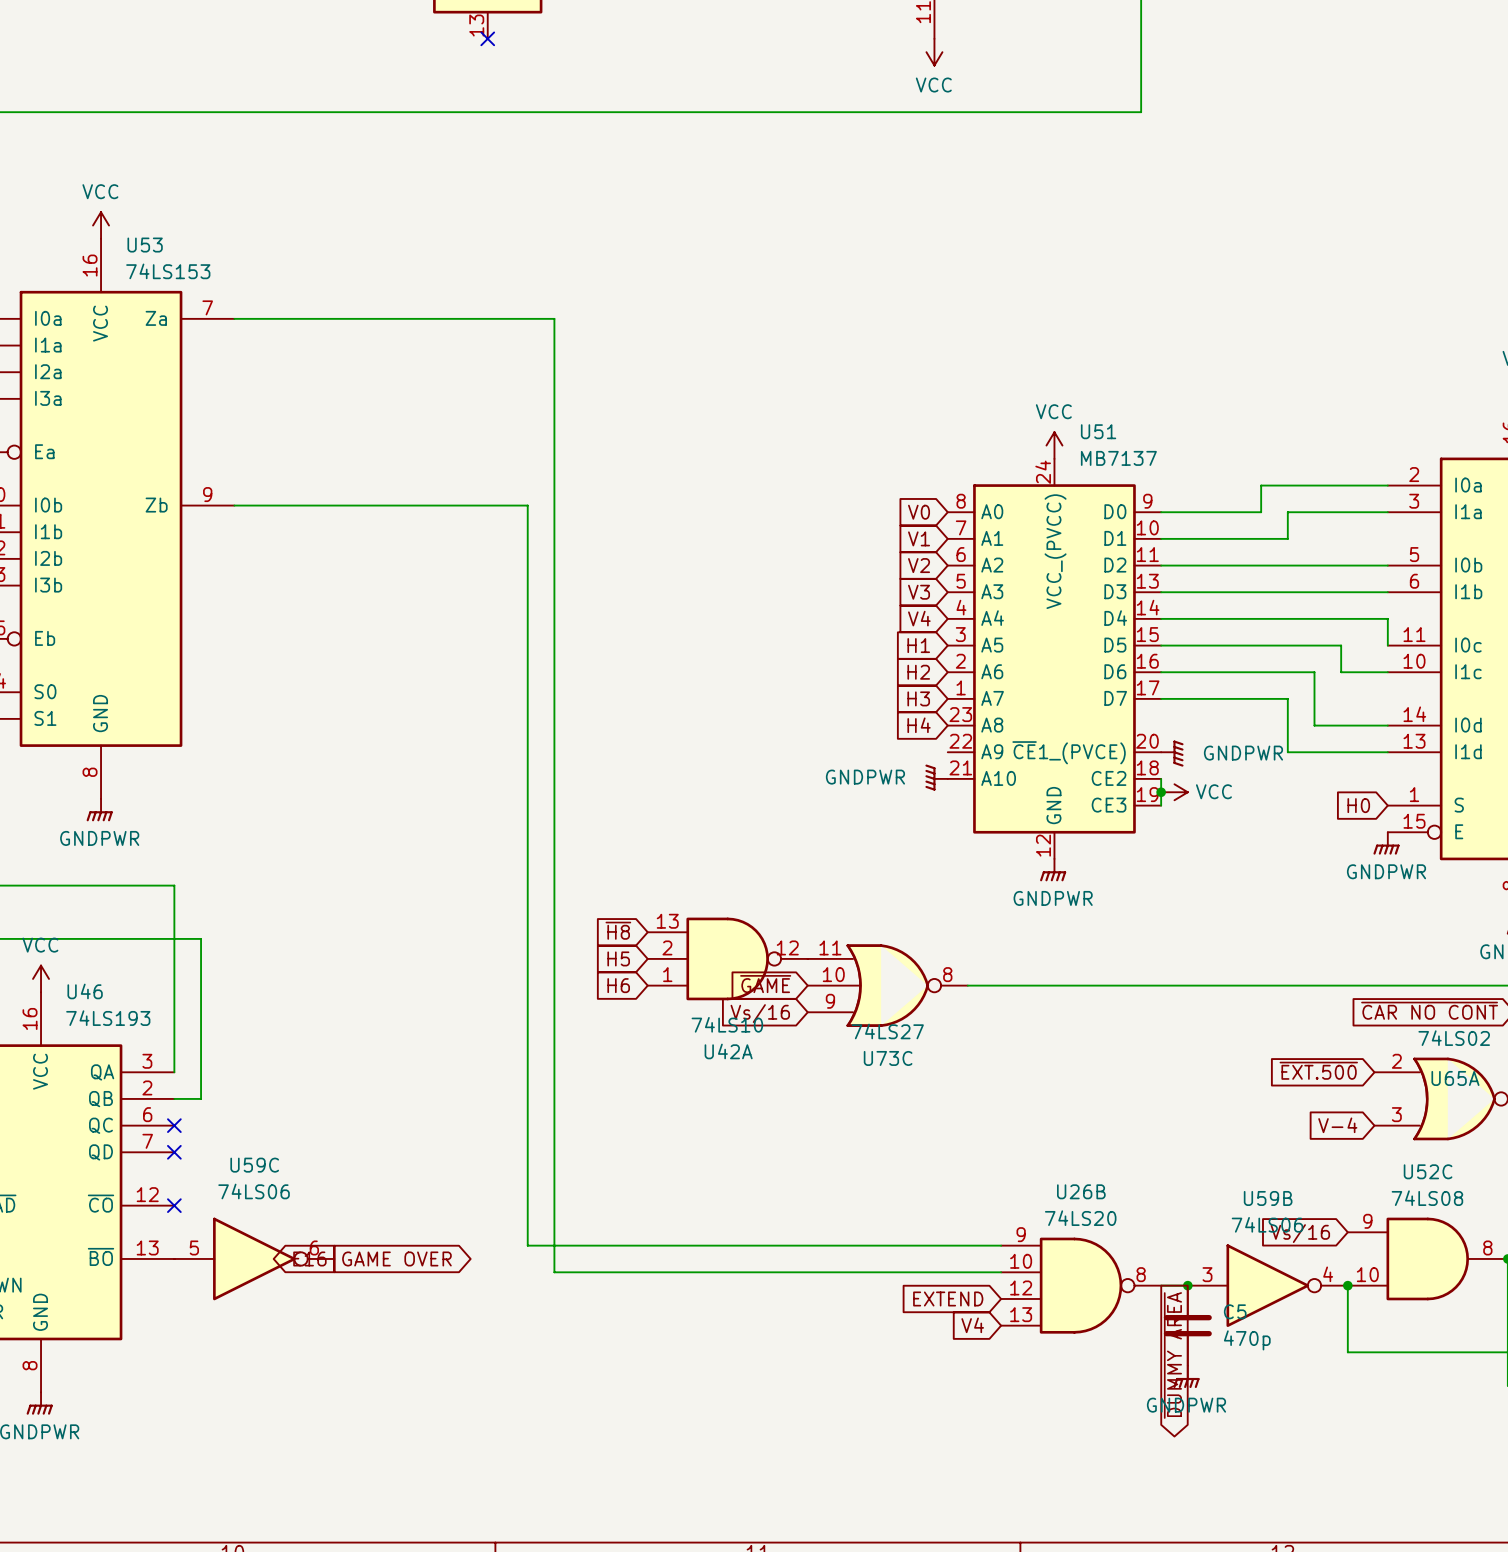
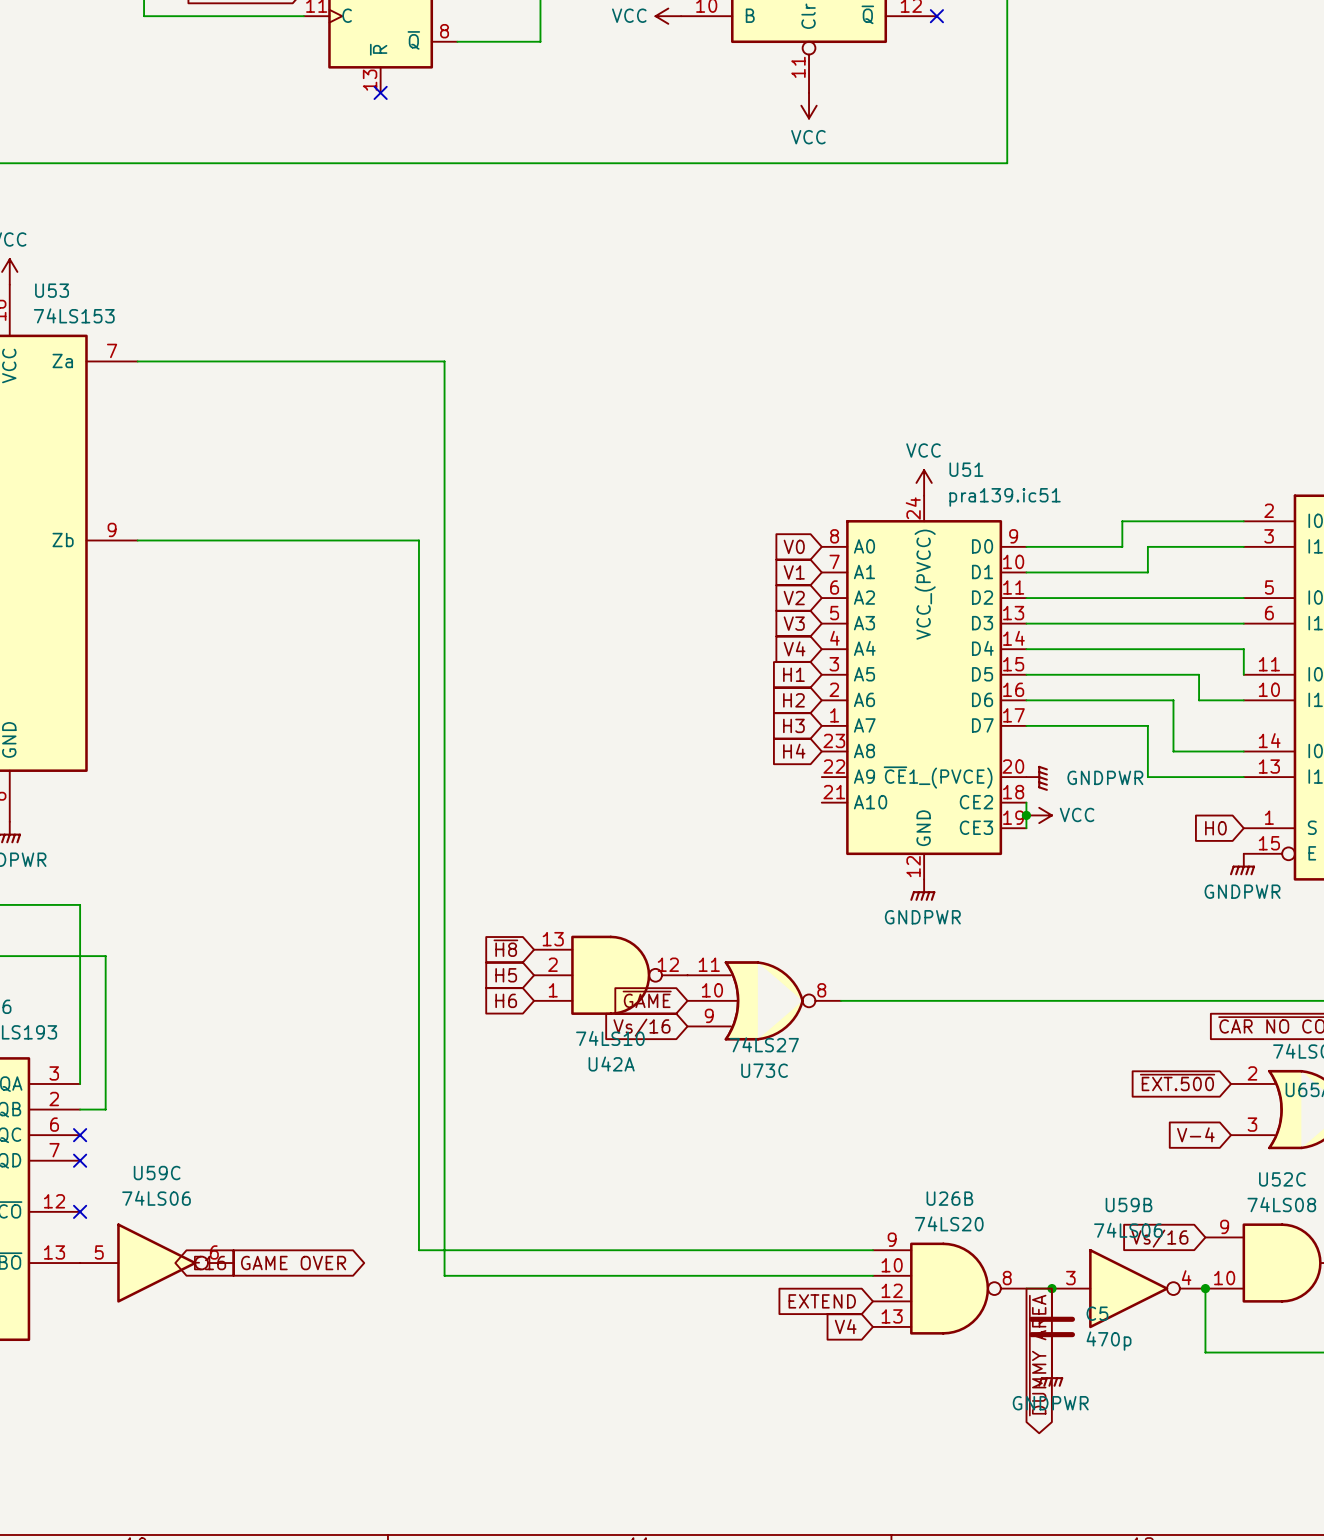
U51 value: MB7137 (1118, 458) -> pra139.ic51 (1005, 497)
power symbol: GNDPWR (936, 777) -> none

